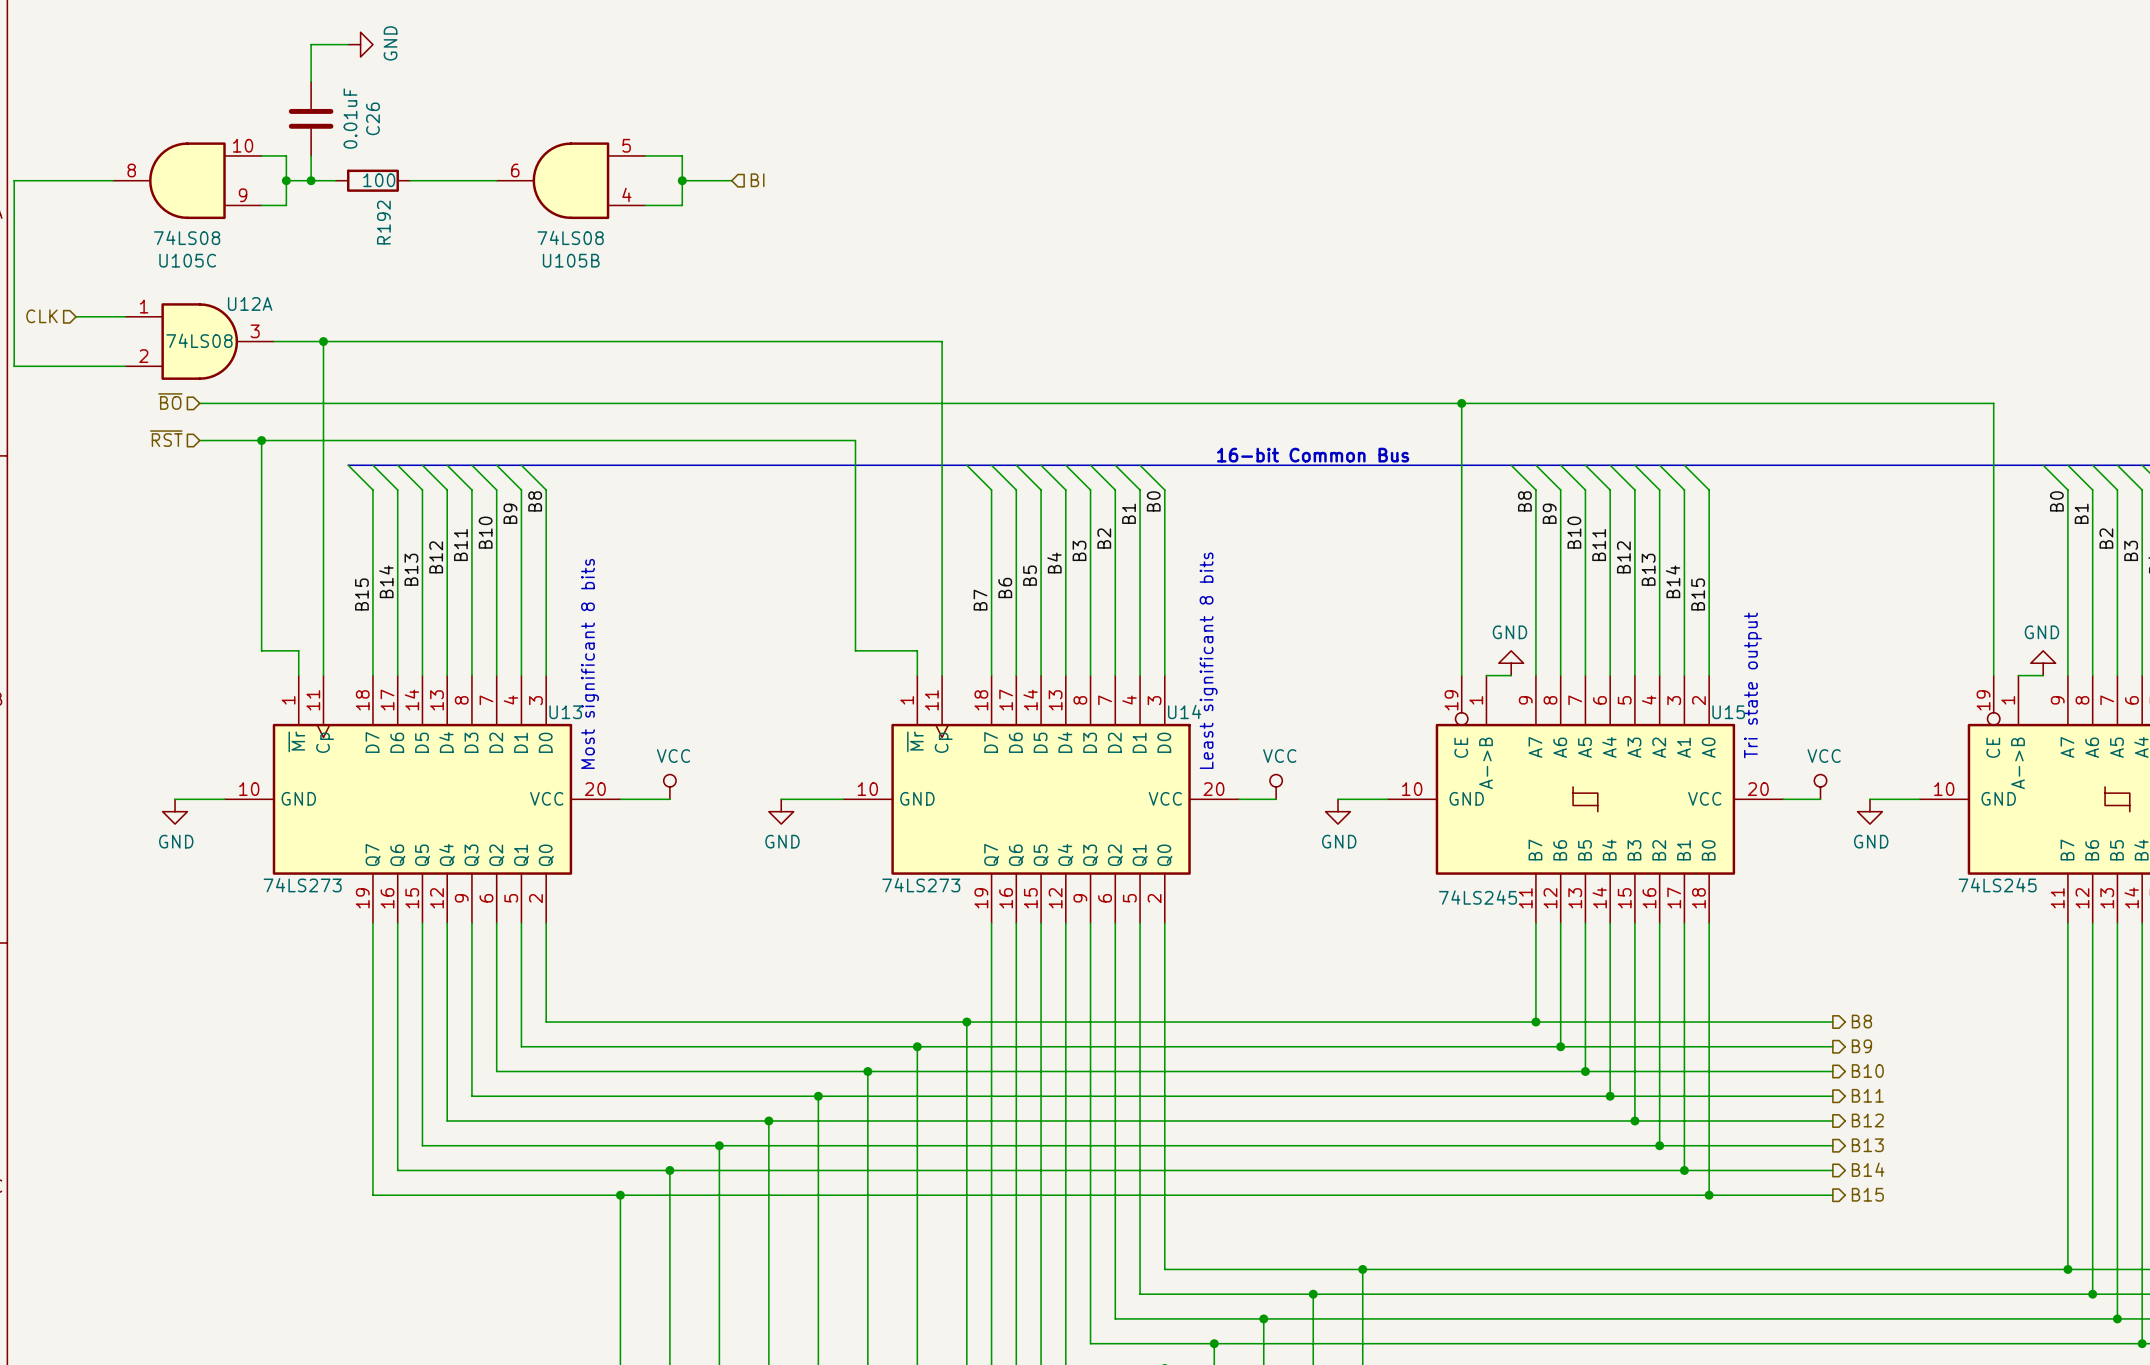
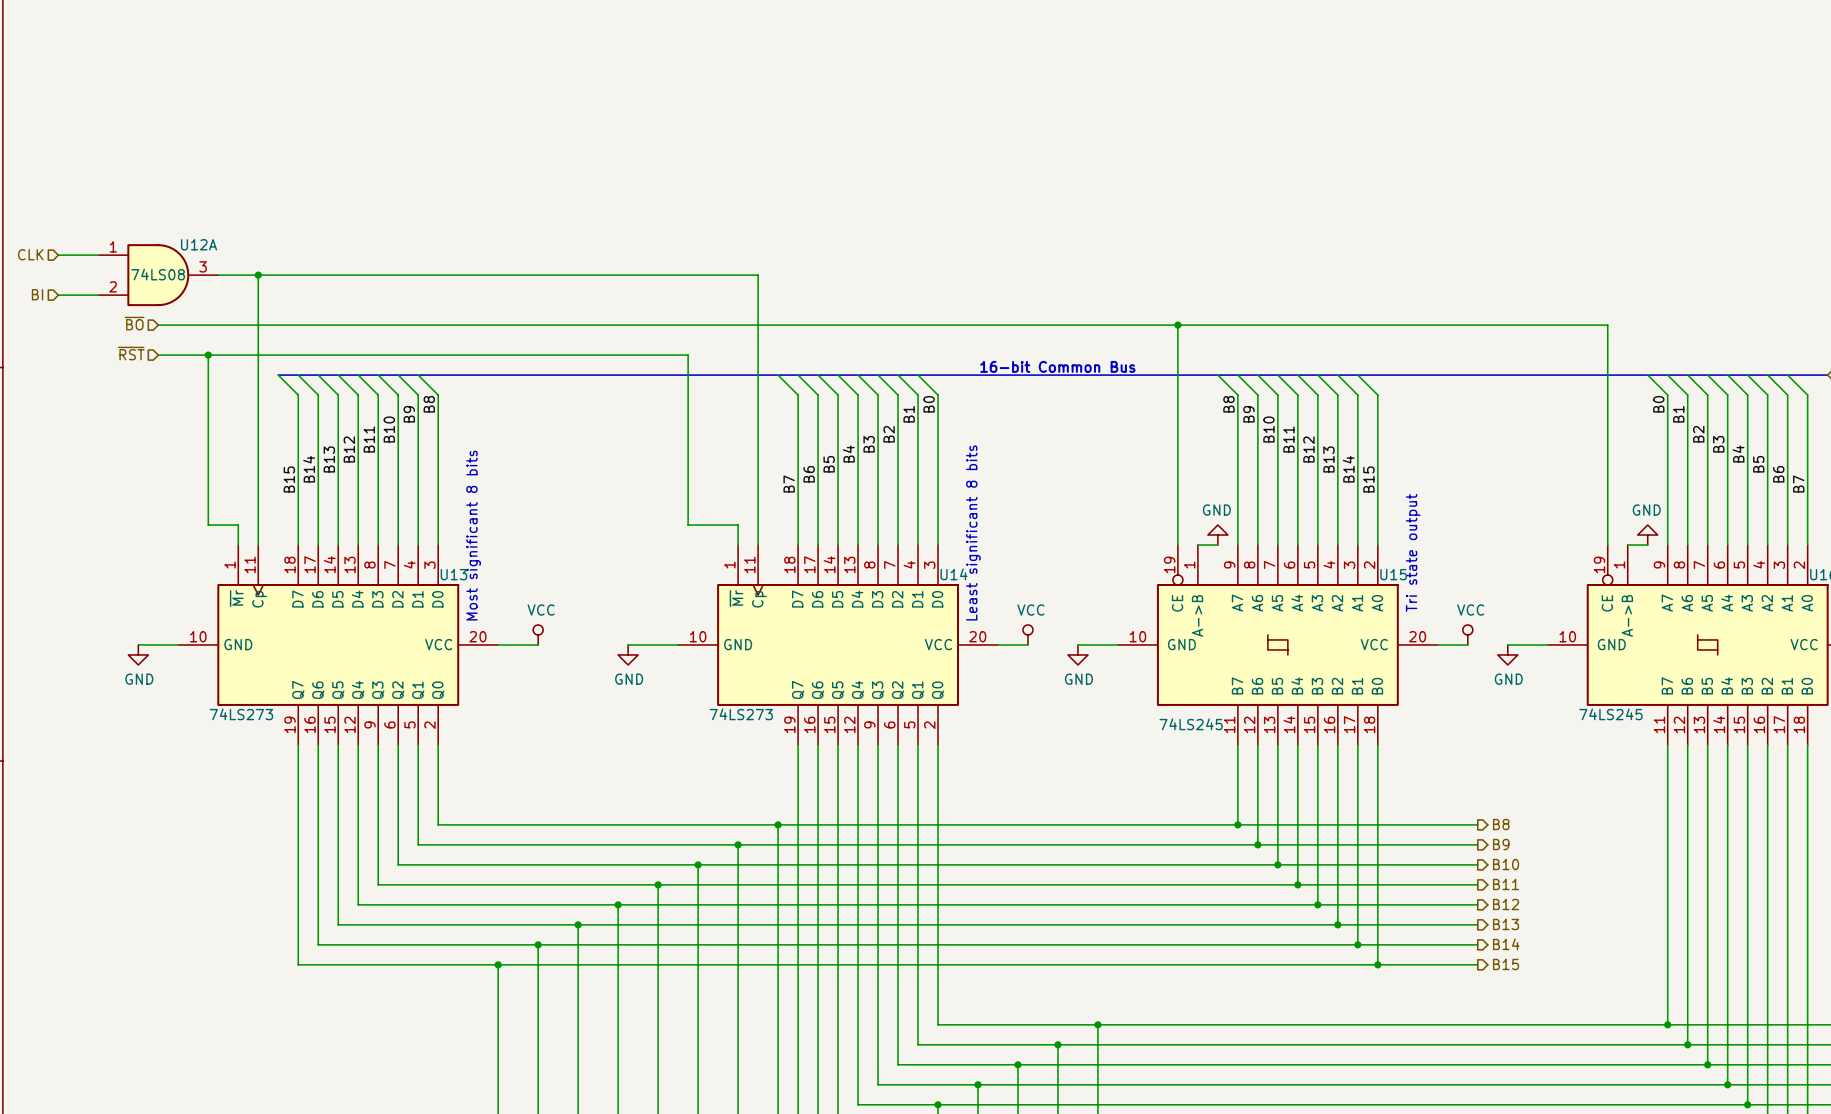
wire: (348, 44) (311, 44) (311, 81) -> none
power symbol: GND (360, 44) -> none
C26: 0.01uF (311, 118) -> none
wire: (261, 155) (286, 155) (286, 205) (261, 205) -> none
wire: (311, 155) (311, 180) -> none
wire: (645, 155) (682, 155) (682, 205) (645, 205) -> none
wire: (113, 180) (14, 180) (14, 366) (76, 366) -> none
U105C: 74LS08 (187, 180) -> none
wire: (286, 180) (335, 180) -> none
junction: (286, 180) -> none
junction: (311, 180) -> none
R192: 100 (372, 180) -> none
wire: (410, 180) (496, 180) -> none
U105B: 74LS08 (570, 180) -> none
wire: (682, 180) (731, 180) -> none
junction: (682, 180) -> none
hierarchical label: BI (757, 180) -> none
hierarchical label: none -> BI (37, 294)

